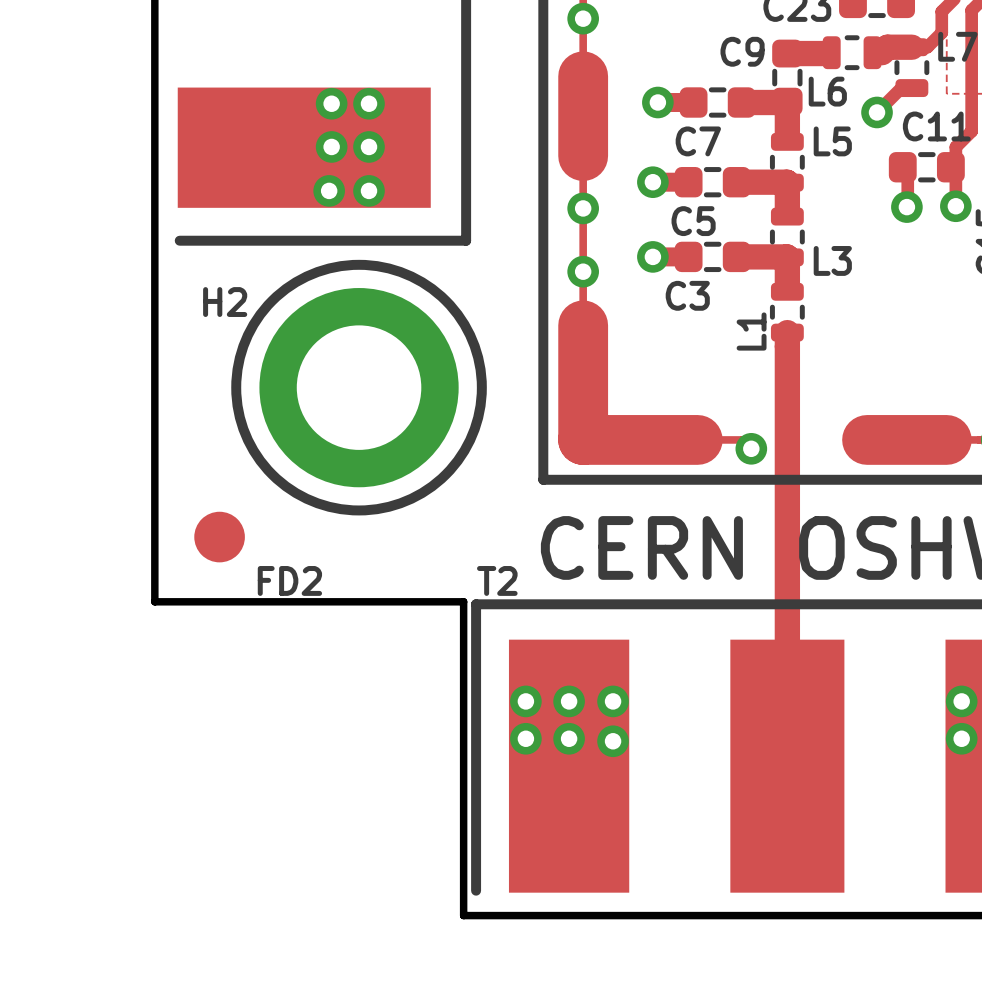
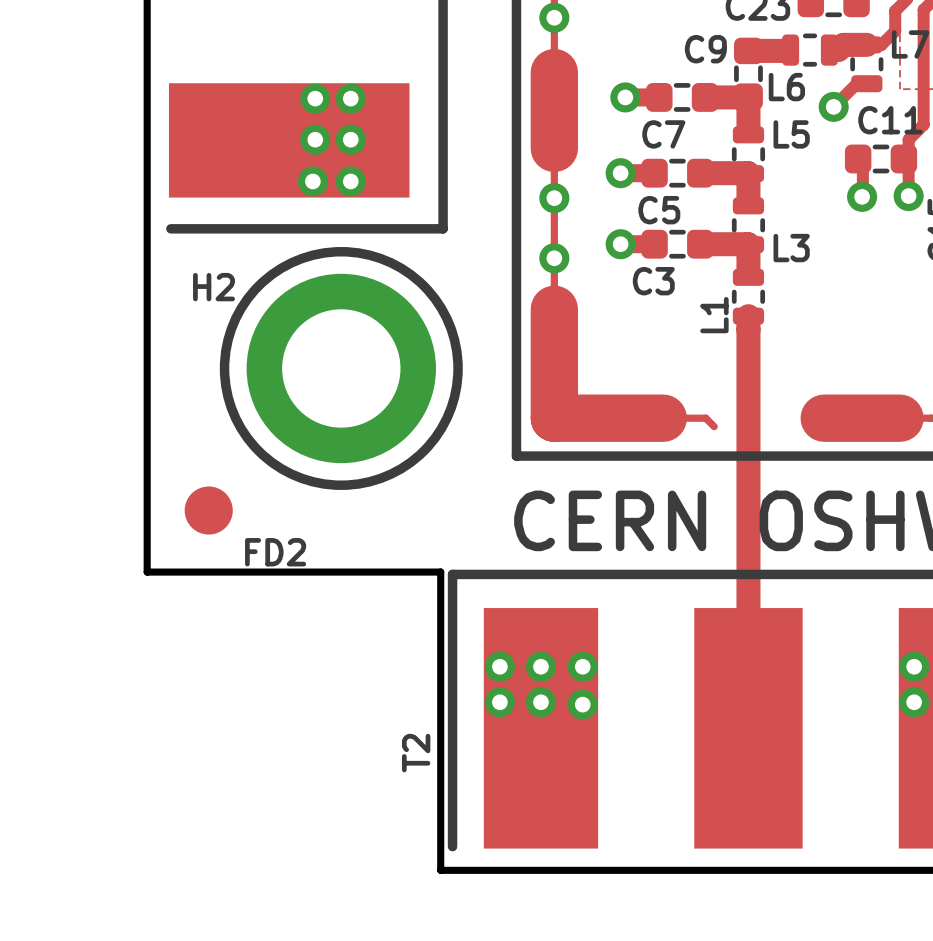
via: (751, 448) -> none
T2 name rotation: 0° (497, 580) -> 90° counterclockwise (416, 753)
T2 name position: T2 (497, 580) -> T2 (416, 753)

